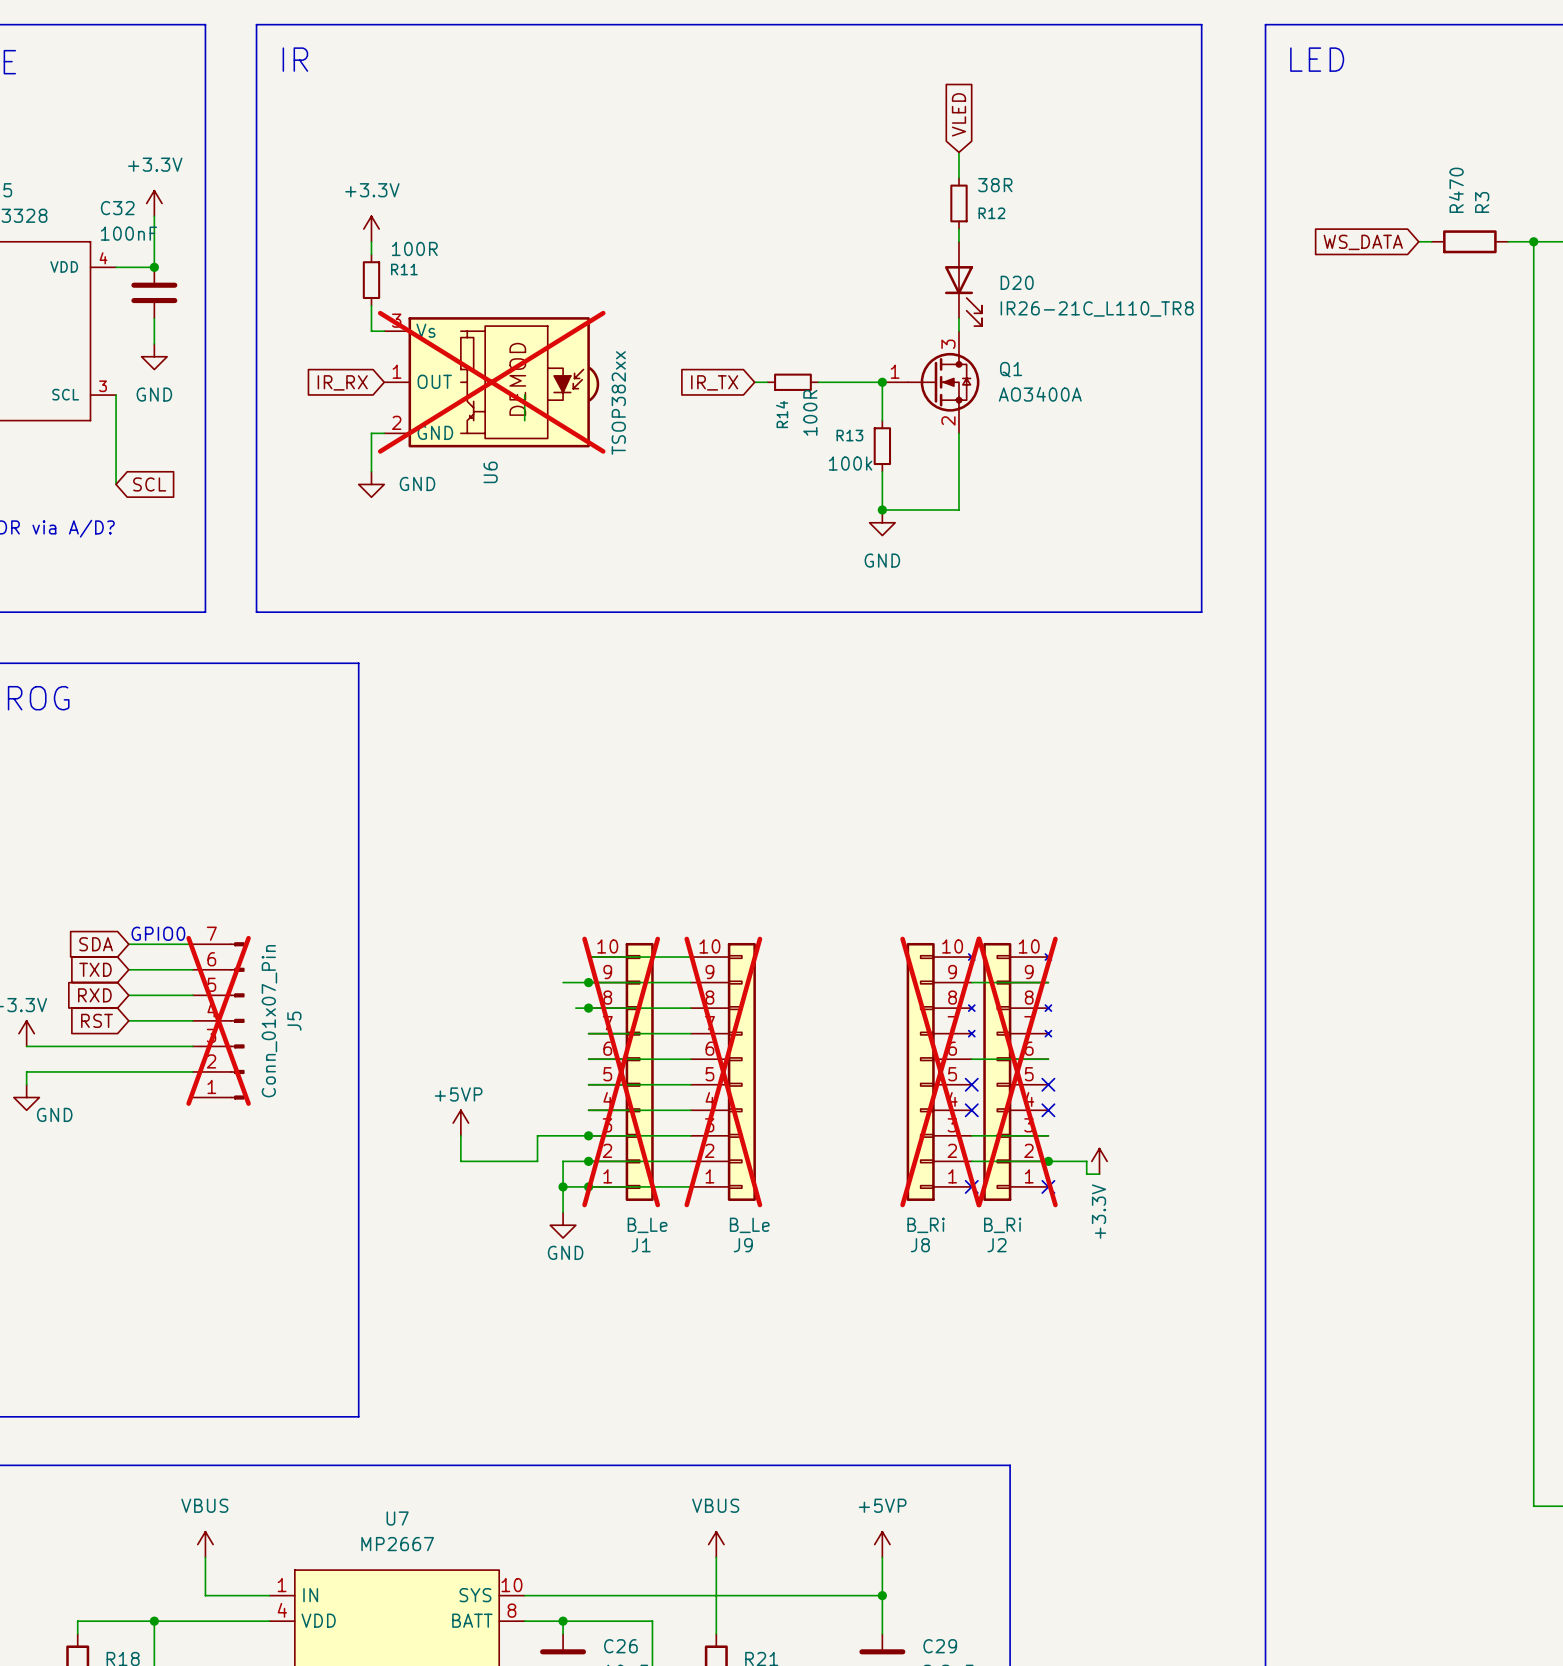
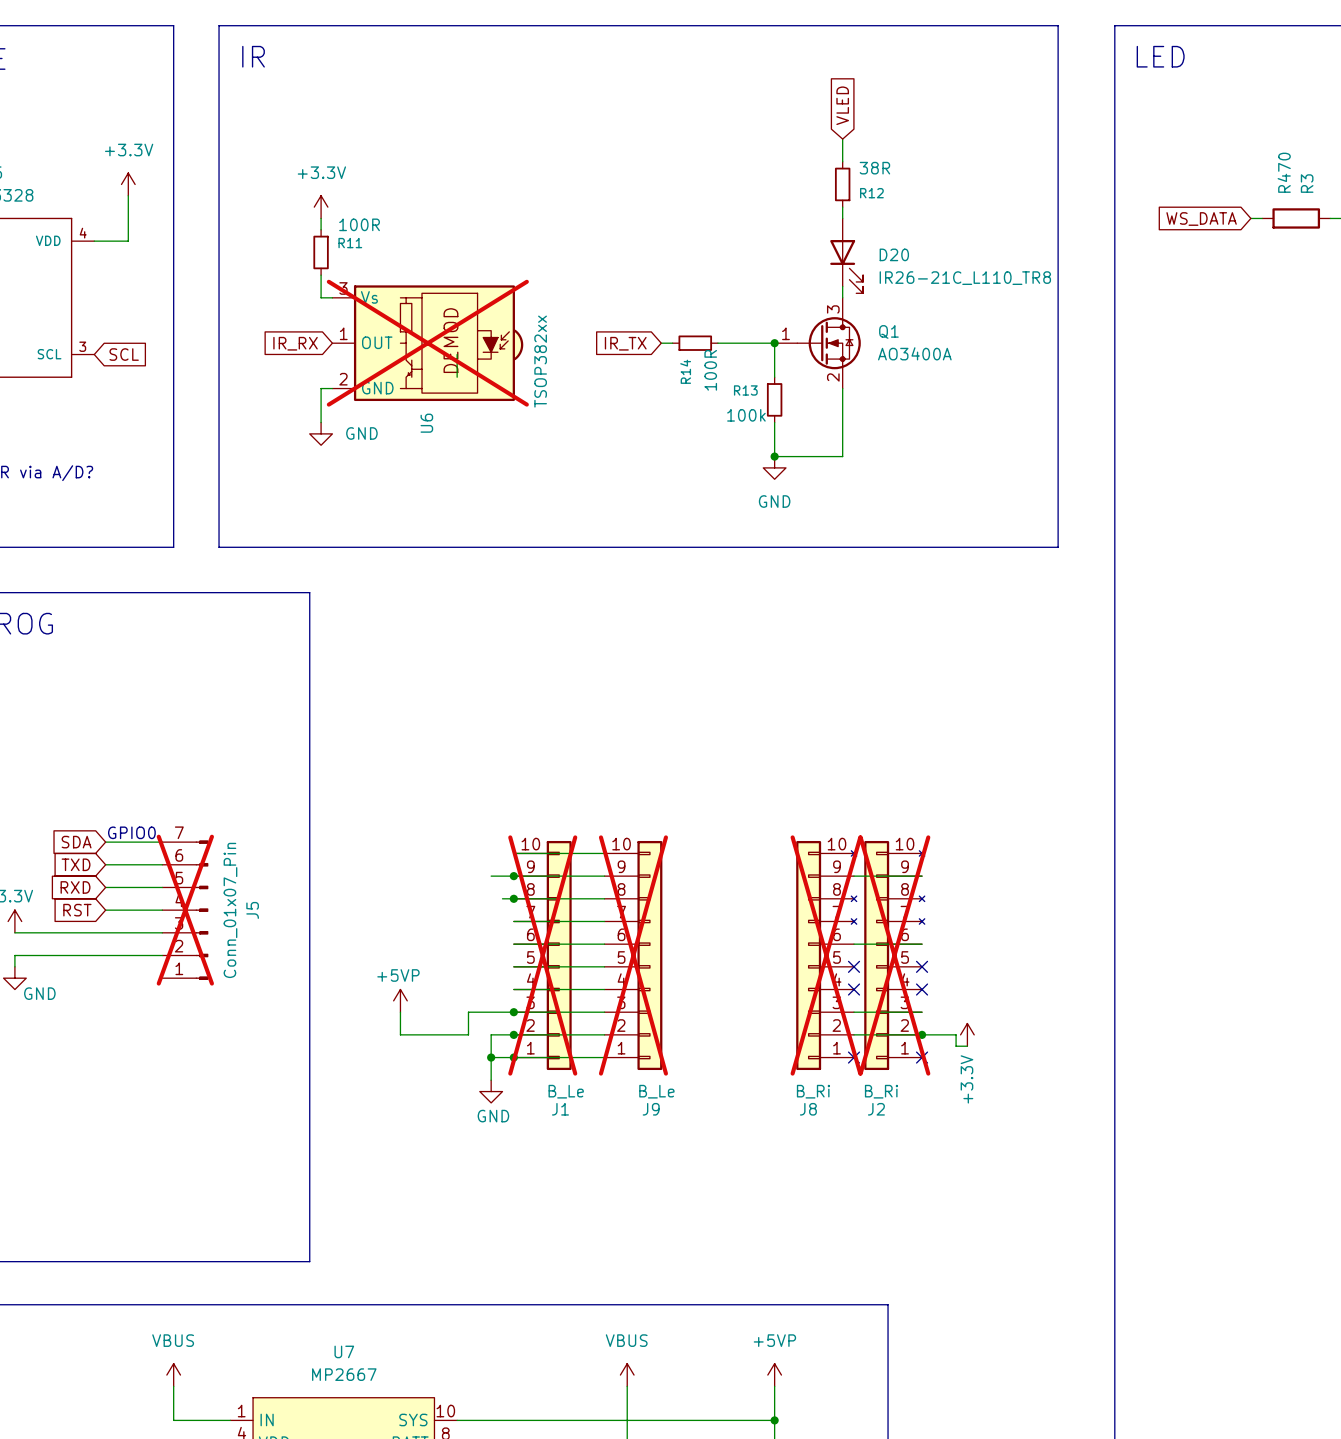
junction: (154, 267) -> none
C32: 100nF (154, 292) -> none
wire: (154, 318) (154, 343) -> none
power symbol: GND (154, 356) -> none
wire: (116, 395) (116, 484) -> none
global label position: SCL (149, 484) -> SCL (124, 354)

